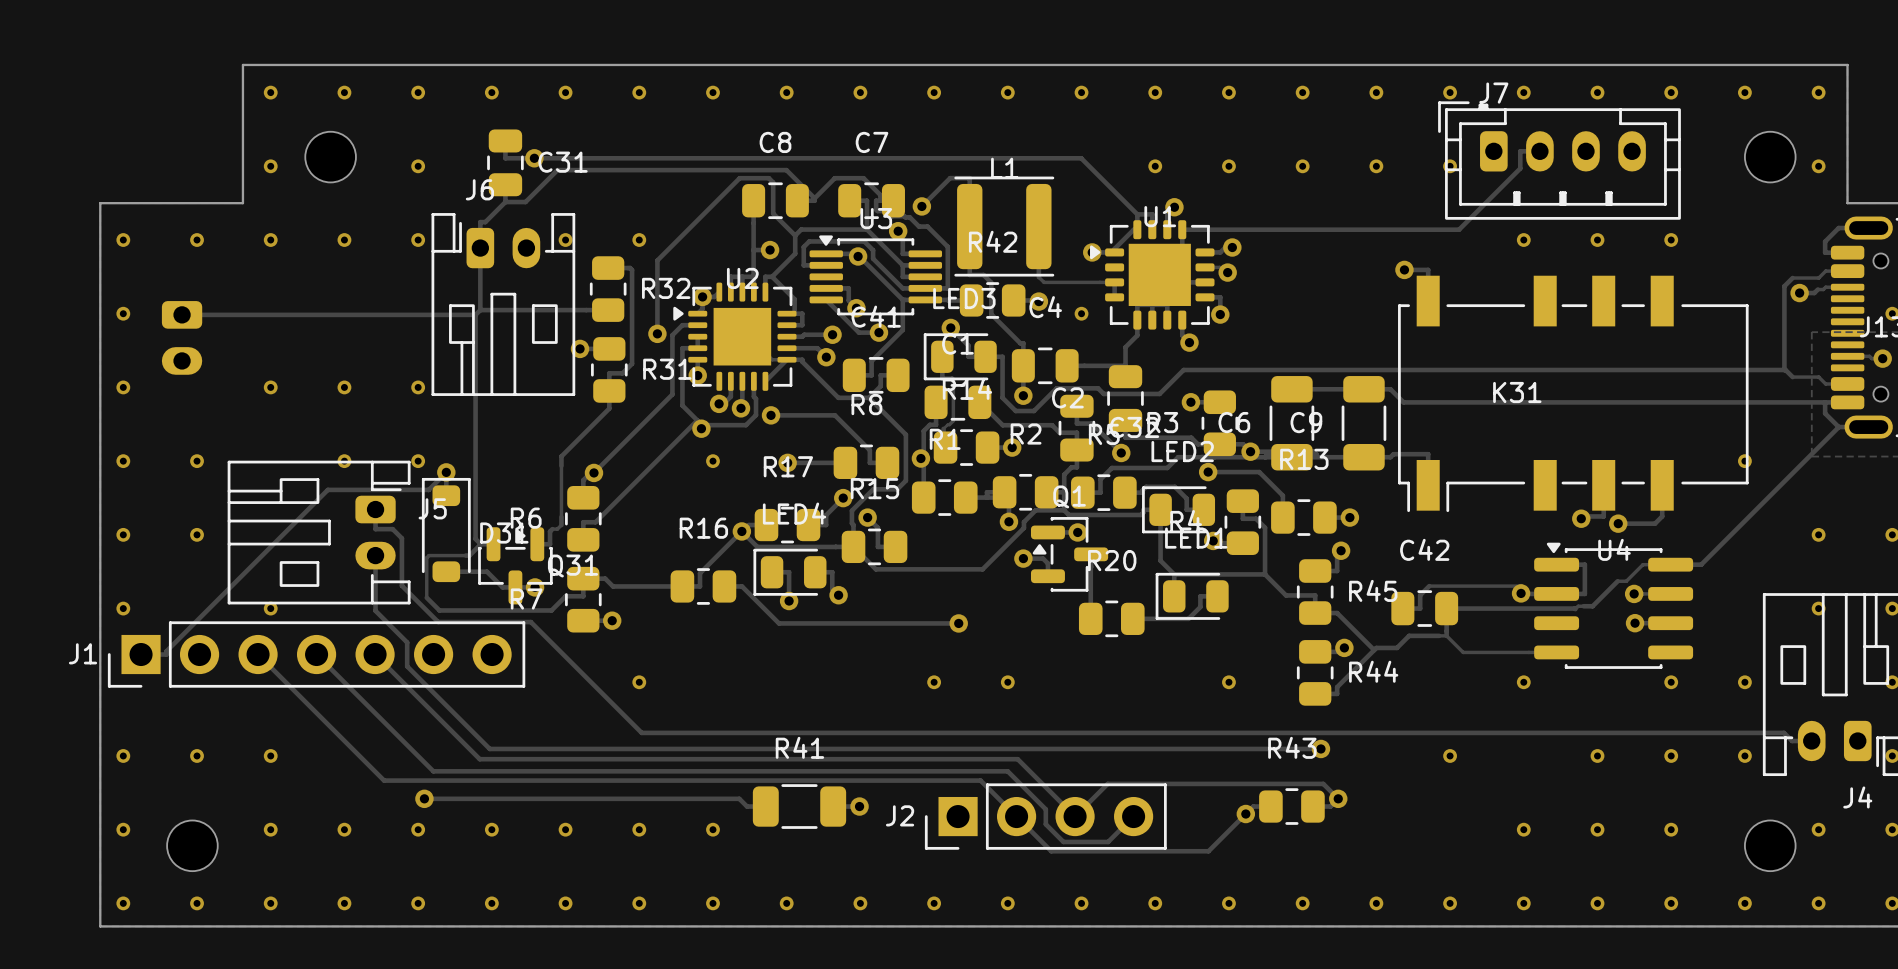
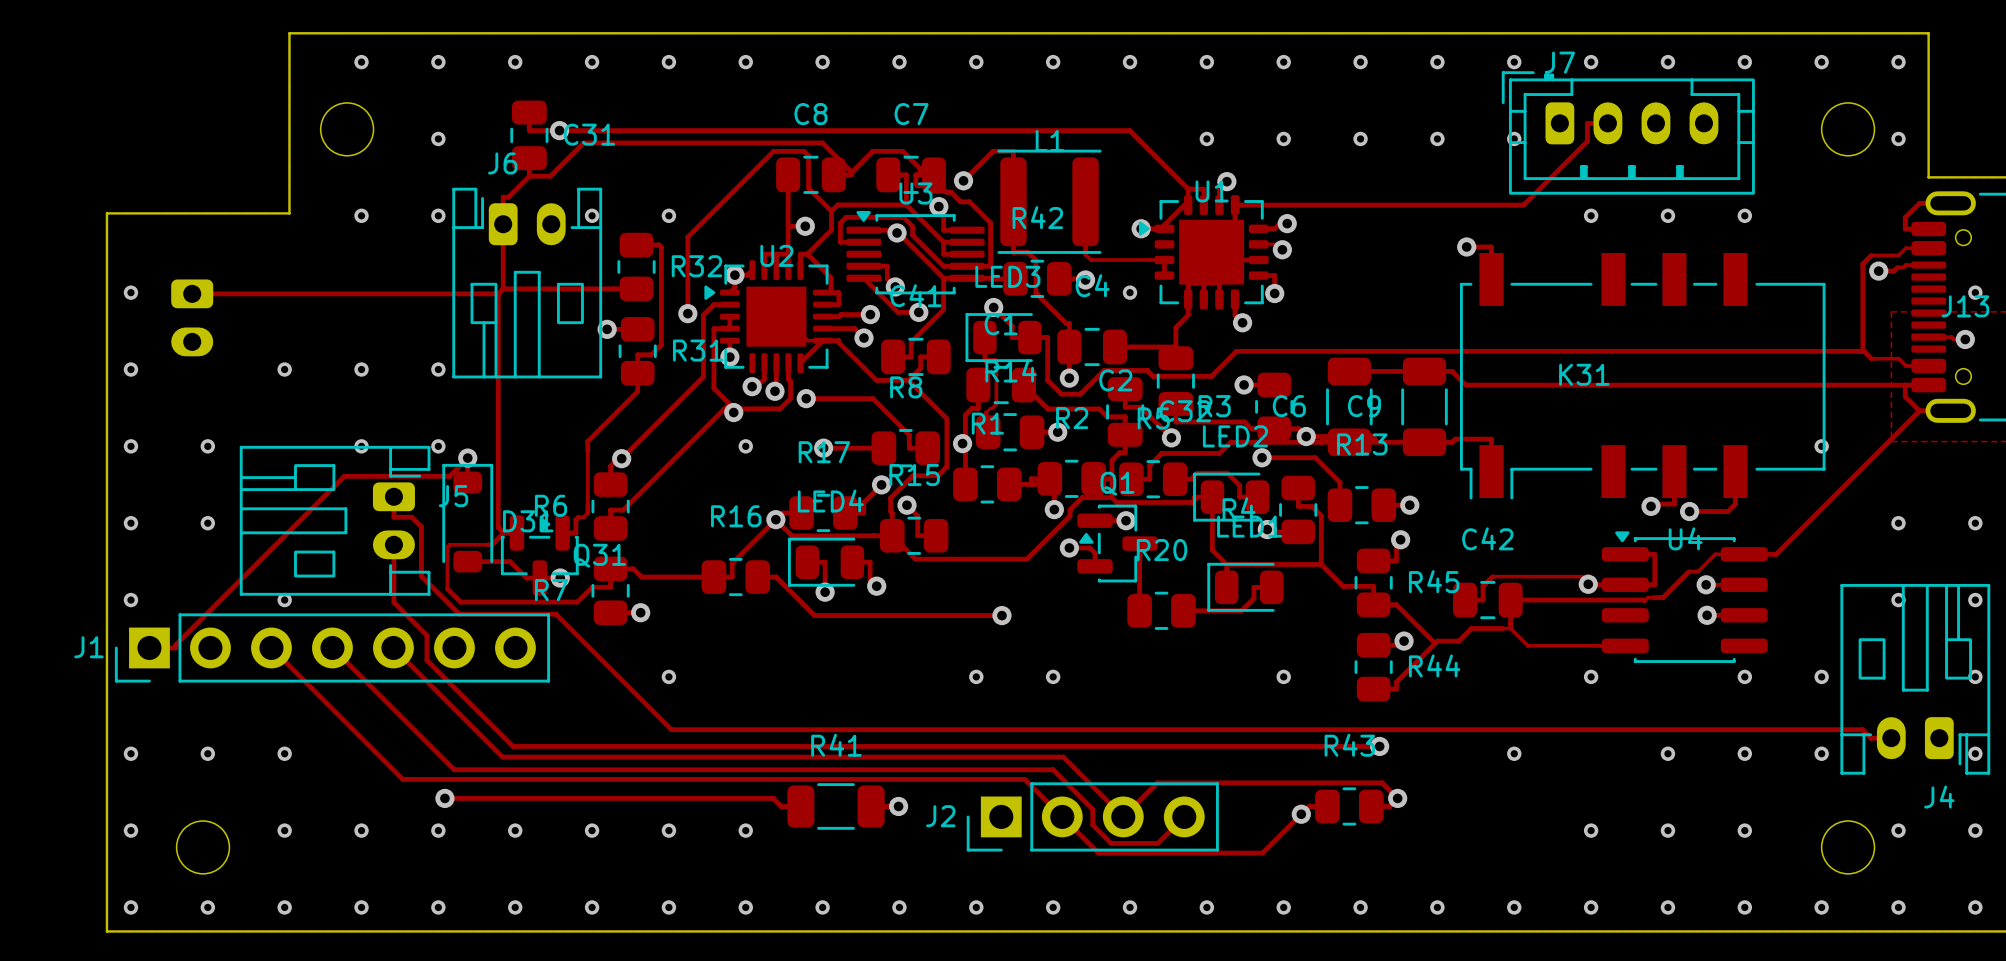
board edge: (275, 64) (242, 64) (242, 203) (100, 203) (100, 237) -> (289, 33) (289, 213) (106, 213)
via: (270, 92) -> none
via: (270, 166) -> none
via: (123, 240) -> none
via: (197, 240) -> none
via: (270, 240) -> none

